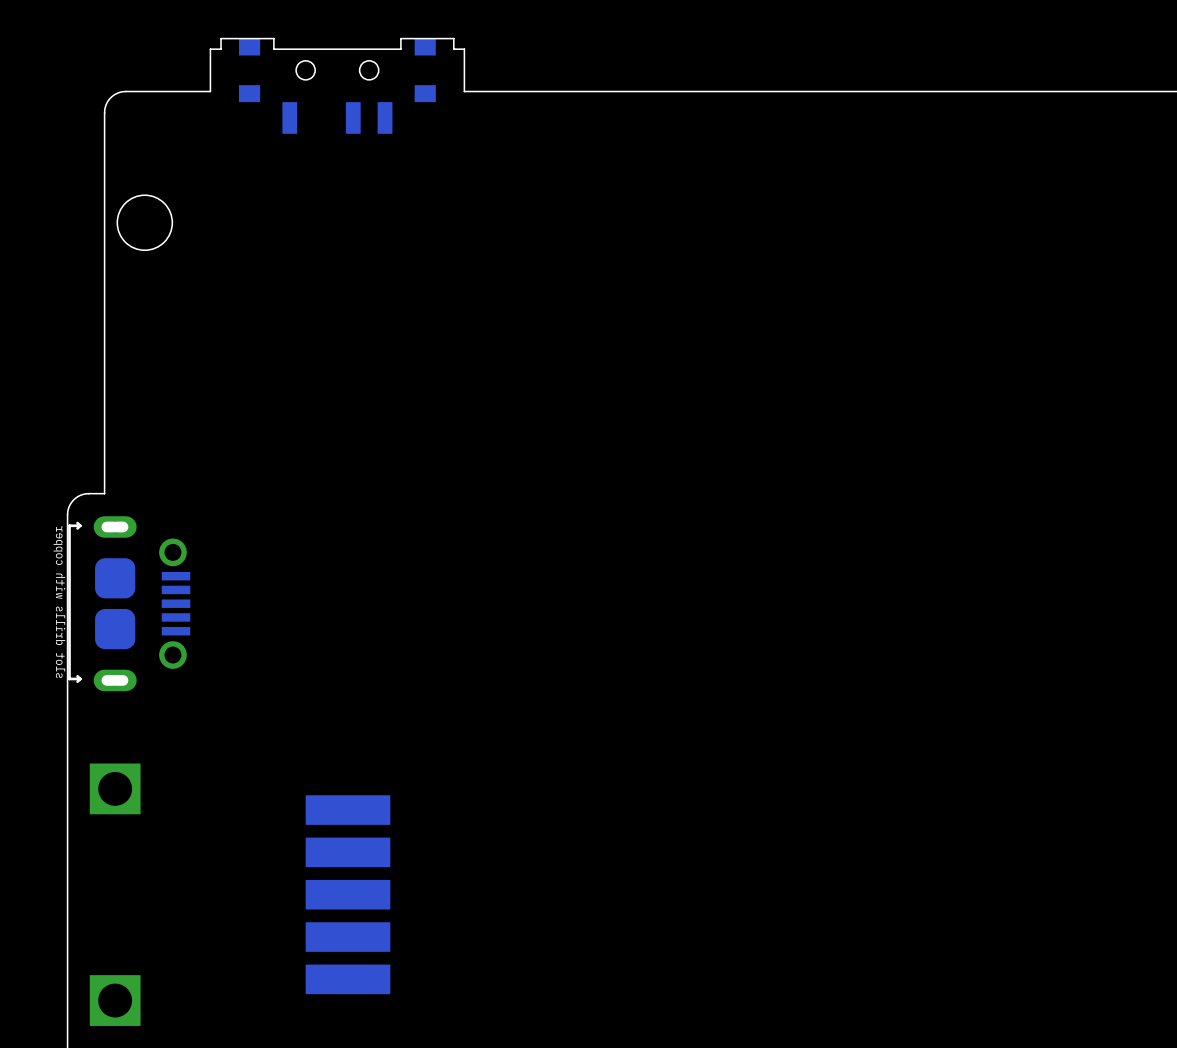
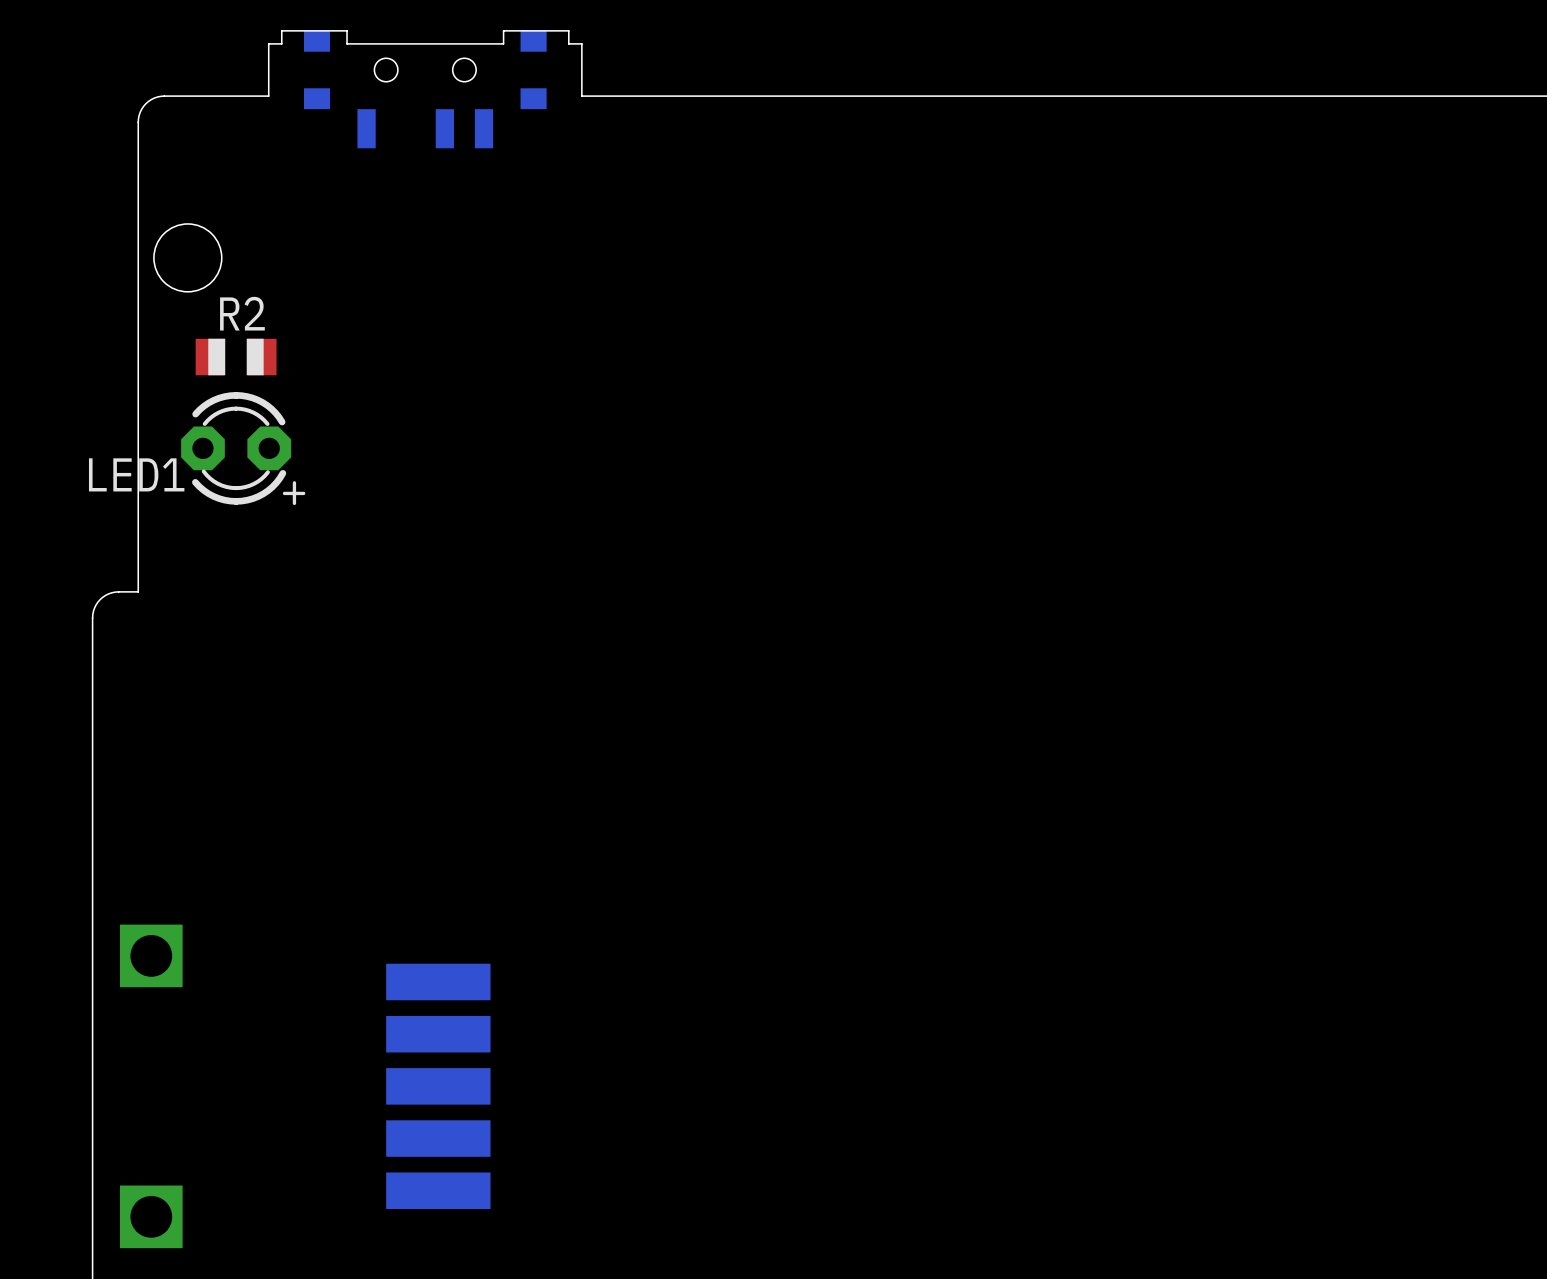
R2: none -> (236, 357)
LED1: none -> (243, 448)
part: (129, 603) -> none

